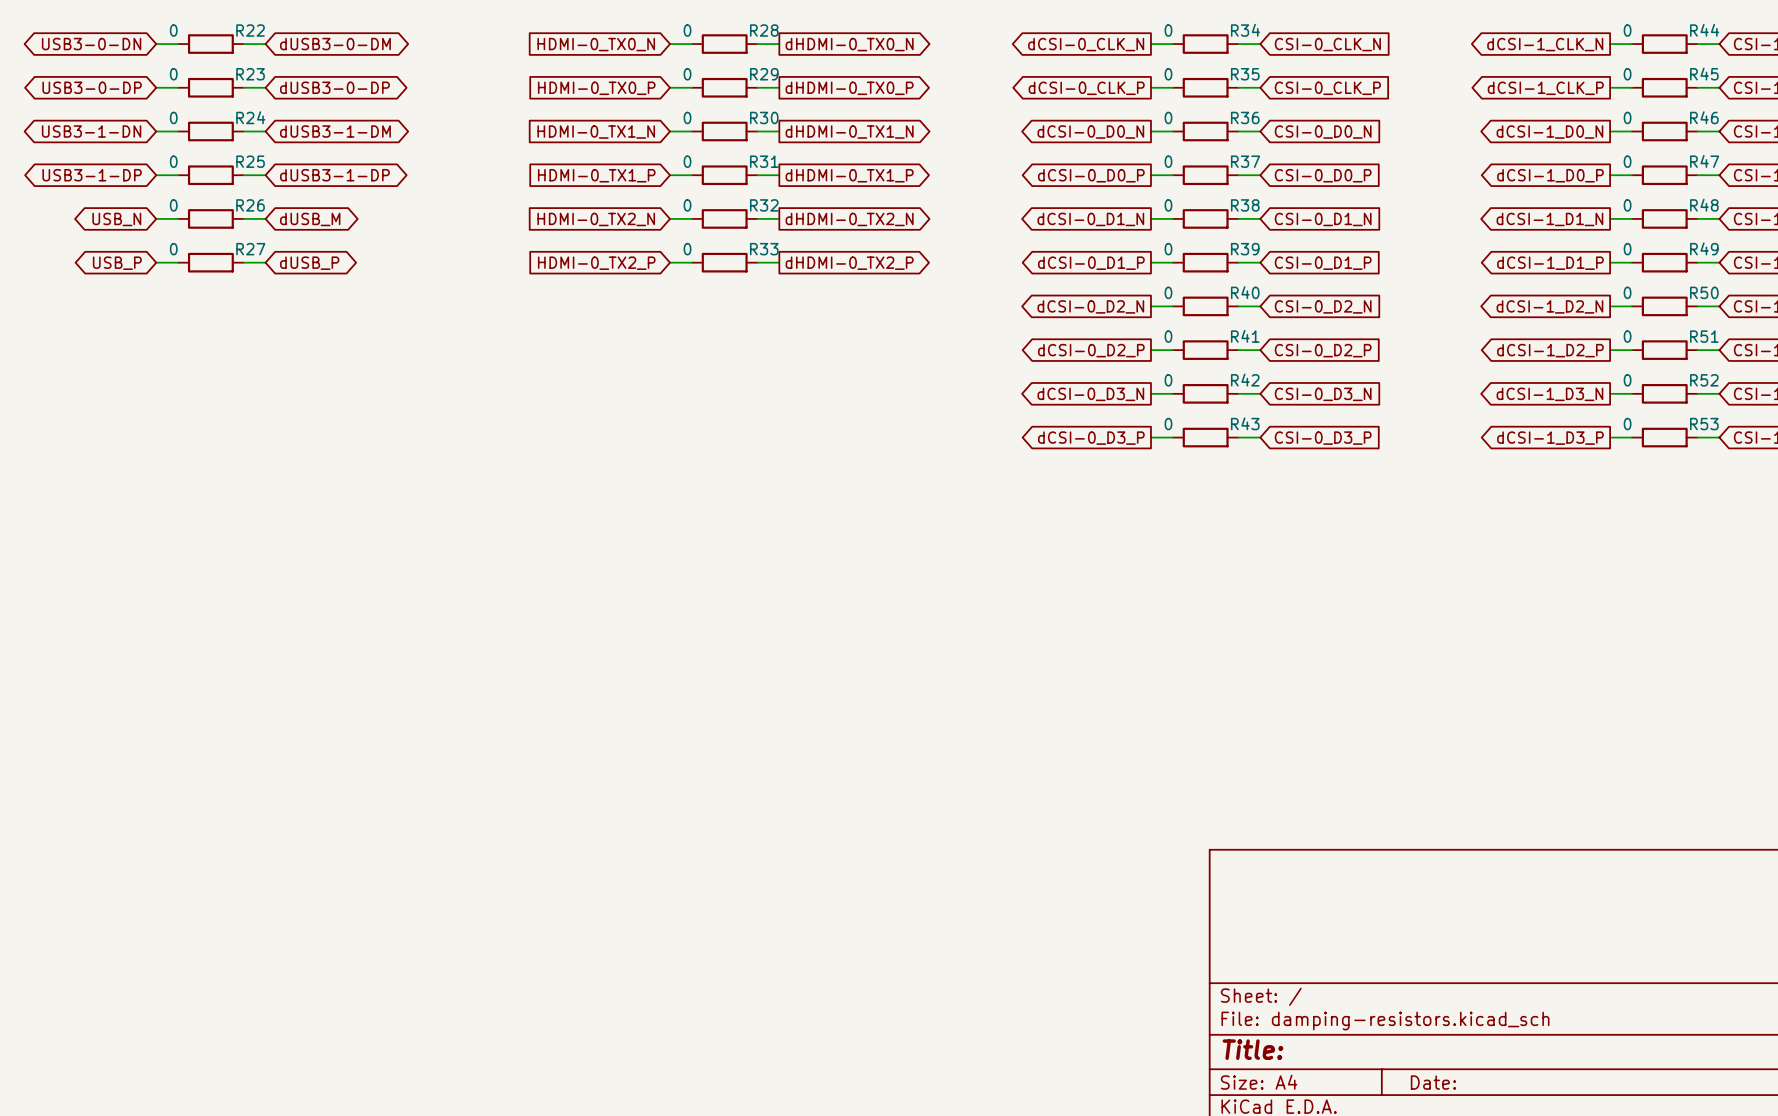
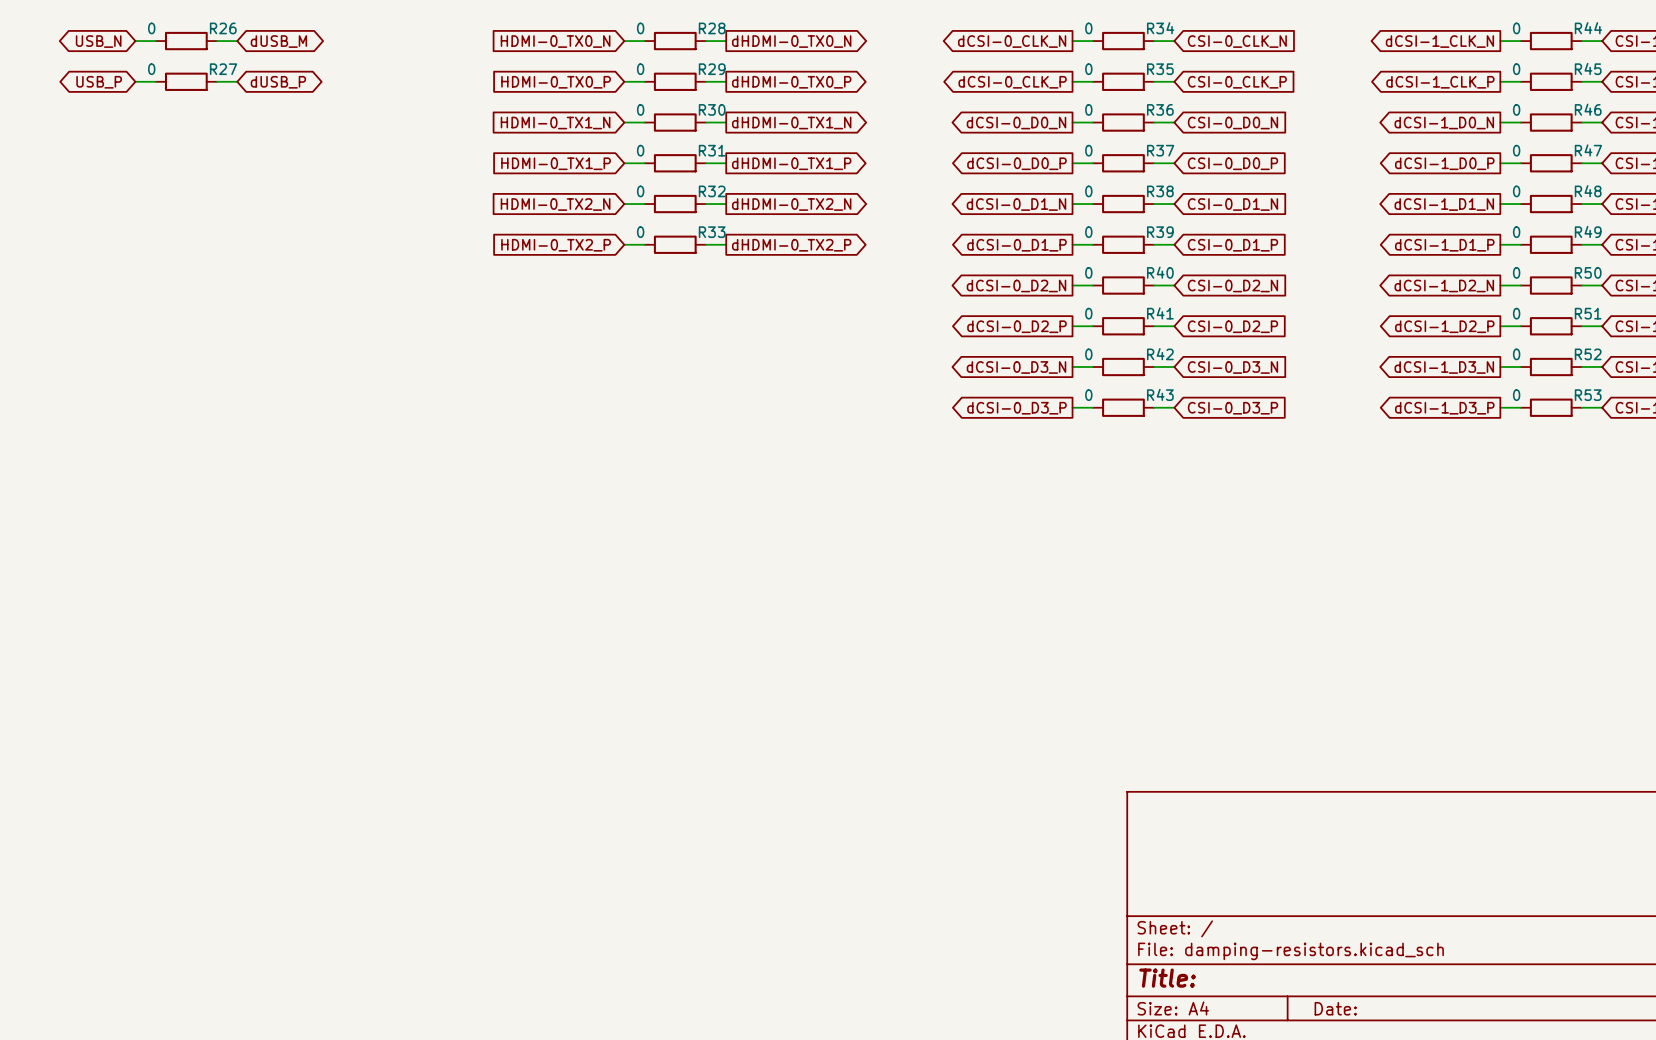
global label: USB3-0-DN (91, 44) -> none
R22: 0 (210, 44) -> none
global label: dUSB3-0-DM (335, 44) -> none
global label: USB3-0-DP (92, 87) -> none
R23: 0 (210, 87) -> none
global label: dUSB3-0-DP (334, 87) -> none
global label: USB3-1-DN (91, 131) -> none
wire: (156, 131) (178, 131) -> none
R24: 0 (210, 131) -> none
wire: (243, 131) (265, 131) -> none
global label: dUSB3-1-DM (335, 131) -> none
global label: USB3-1-DP (92, 175) -> none
wire: (156, 175) (178, 175) -> none
R25: 0 (210, 175) -> none
wire: (243, 175) (265, 175) -> none
global label: dUSB3-1-DP (334, 175) -> none
wire: (156, 218) (178, 218) -> none
R26 position: (210, 218) -> (186, 41)
wire: (243, 218) (265, 218) -> none
global label position: USB_N (116, 219) -> USB_N (98, 41)
global label position: dUSB_M (310, 219) -> dUSB_M (278, 41)
wire: (156, 262) (178, 262) -> none
R27 position: (210, 262) -> (186, 81)
wire: (243, 262) (265, 262) -> none
global label position: USB_P (117, 263) -> USB_P (99, 82)
global label position: dUSB_P (309, 263) -> dUSB_P (278, 82)

